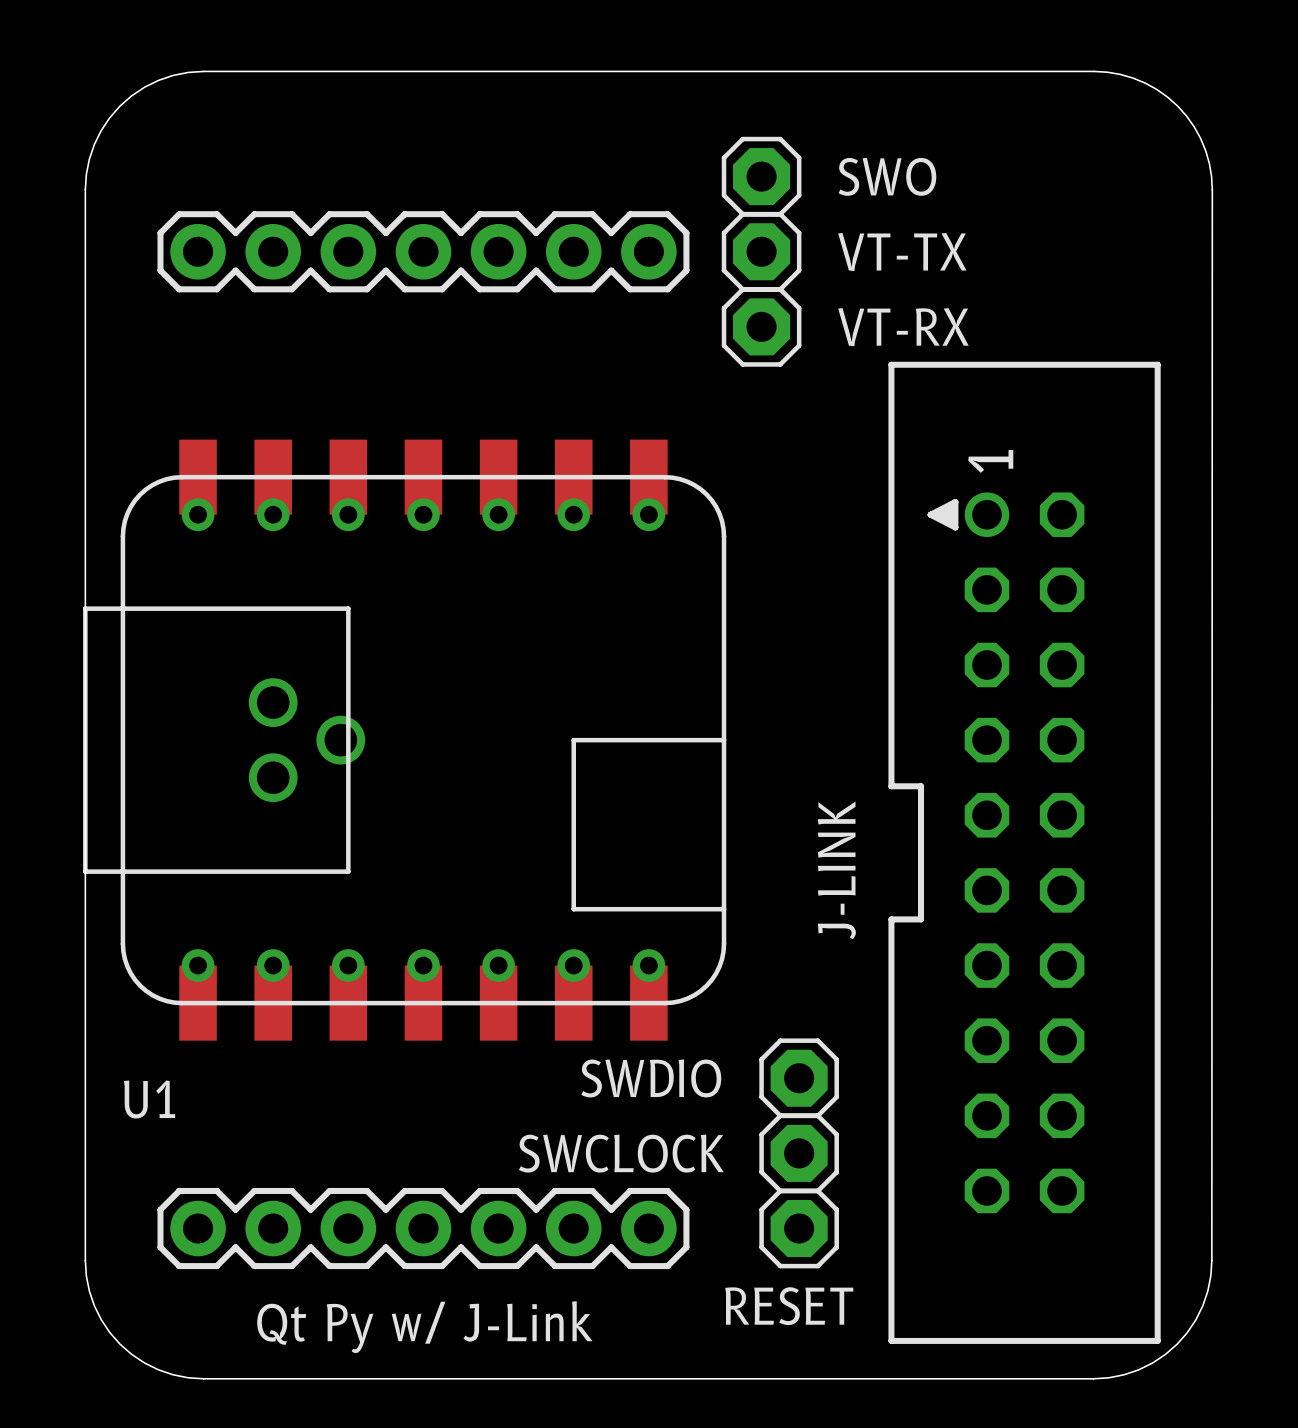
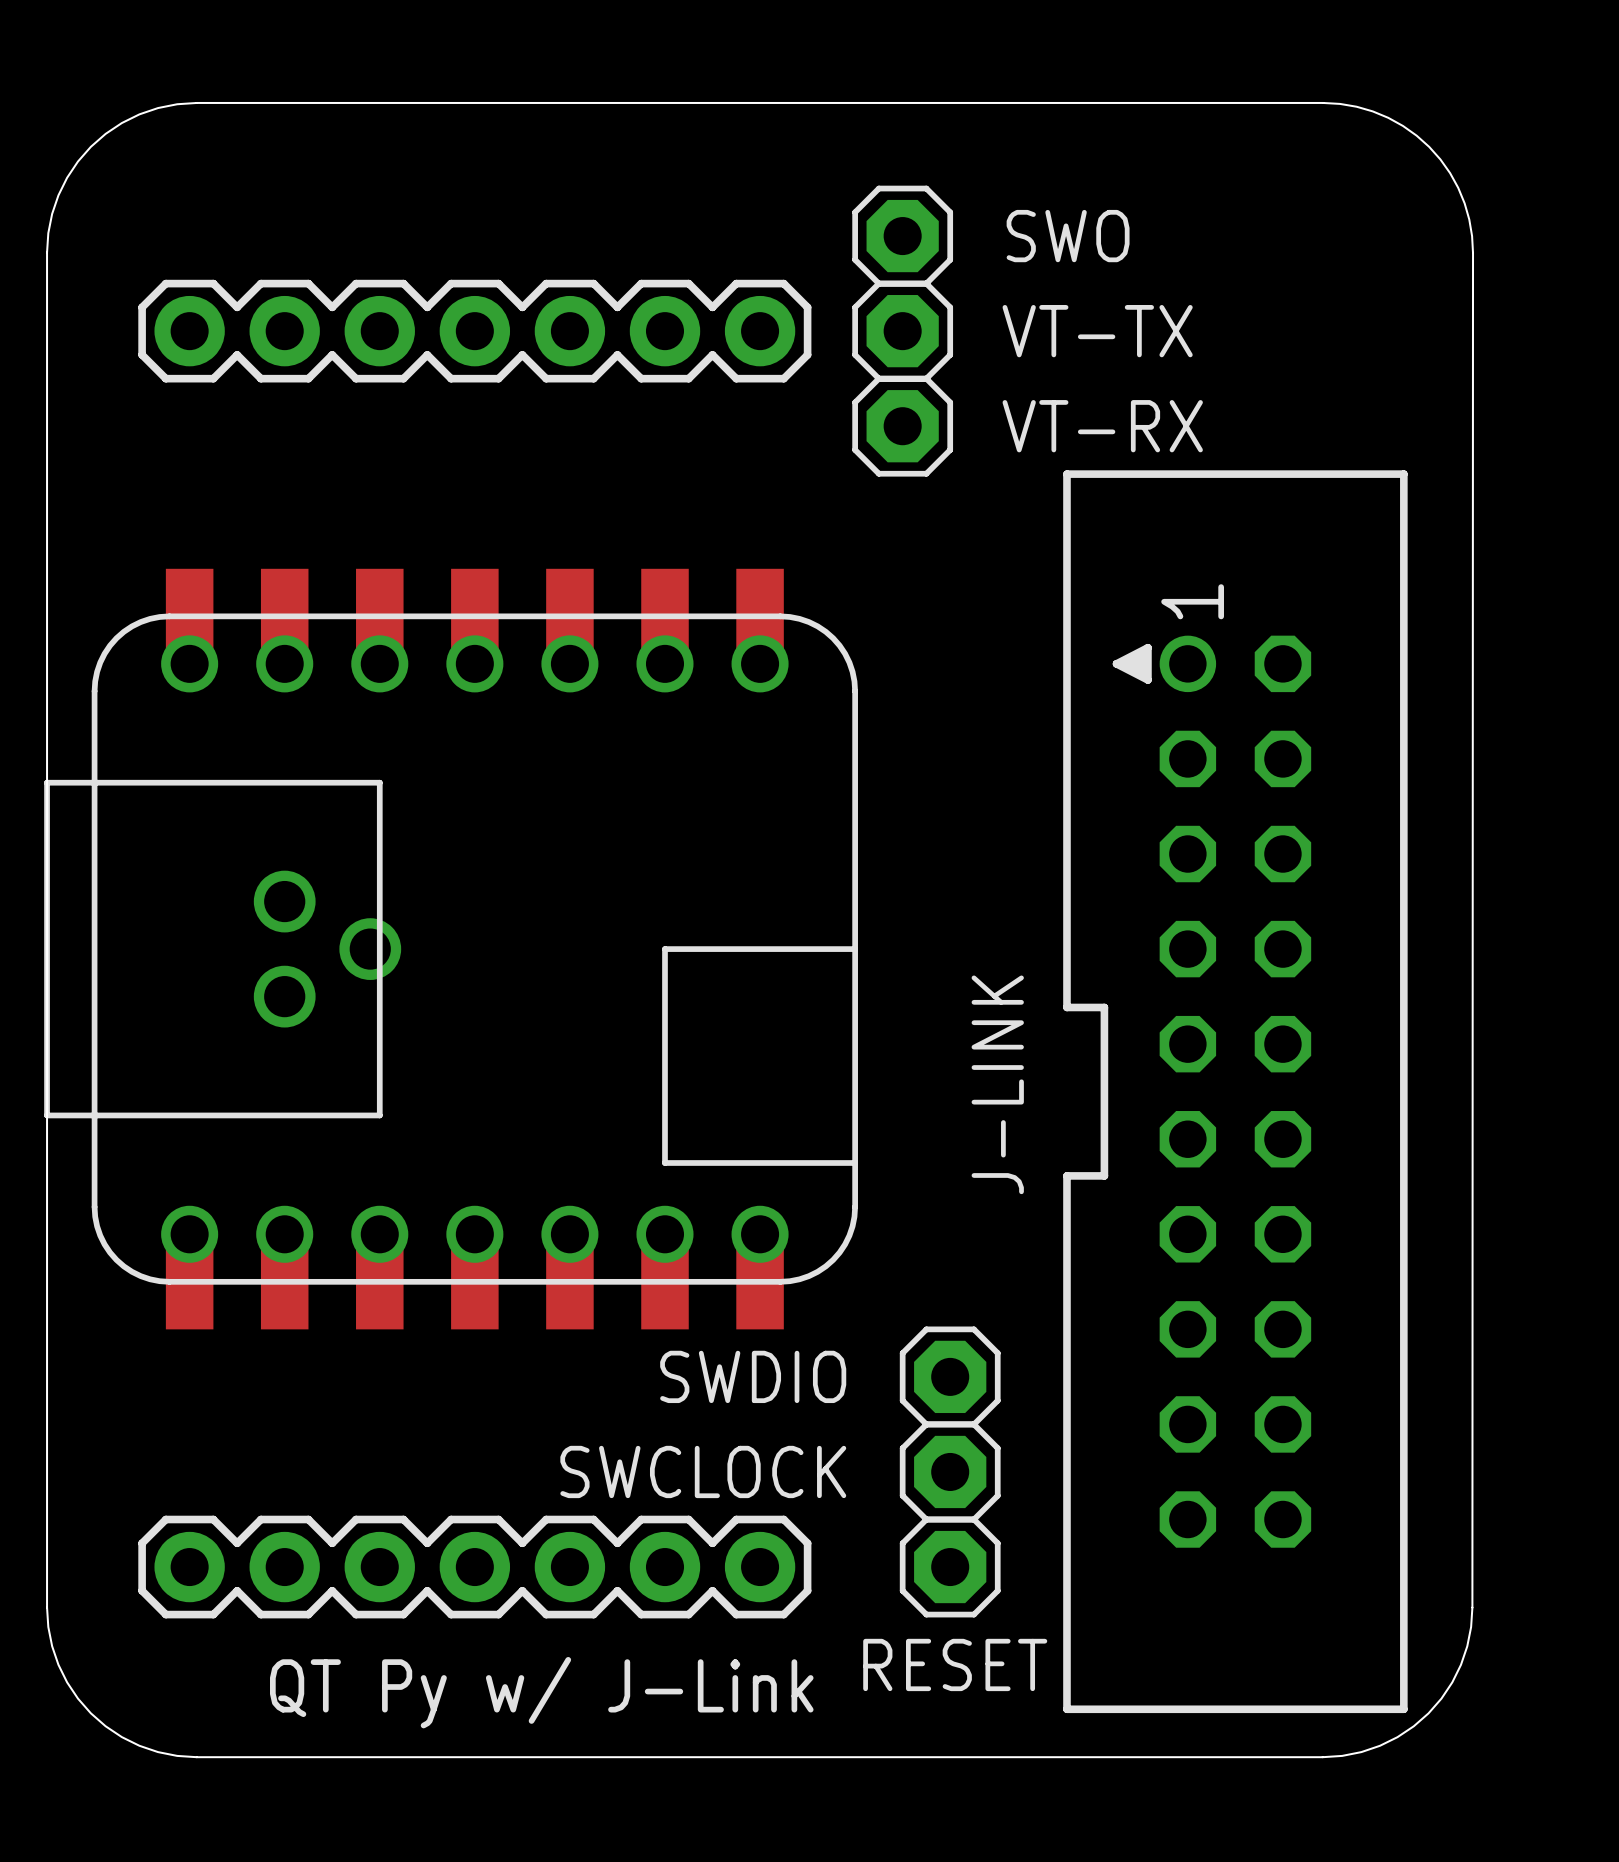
U1: (404, 740) -> none
part: none -> (451, 949)
text: Qt Py w/ J-Link (424, 1327) -> QT Py w/ J-Link (541, 1692)

